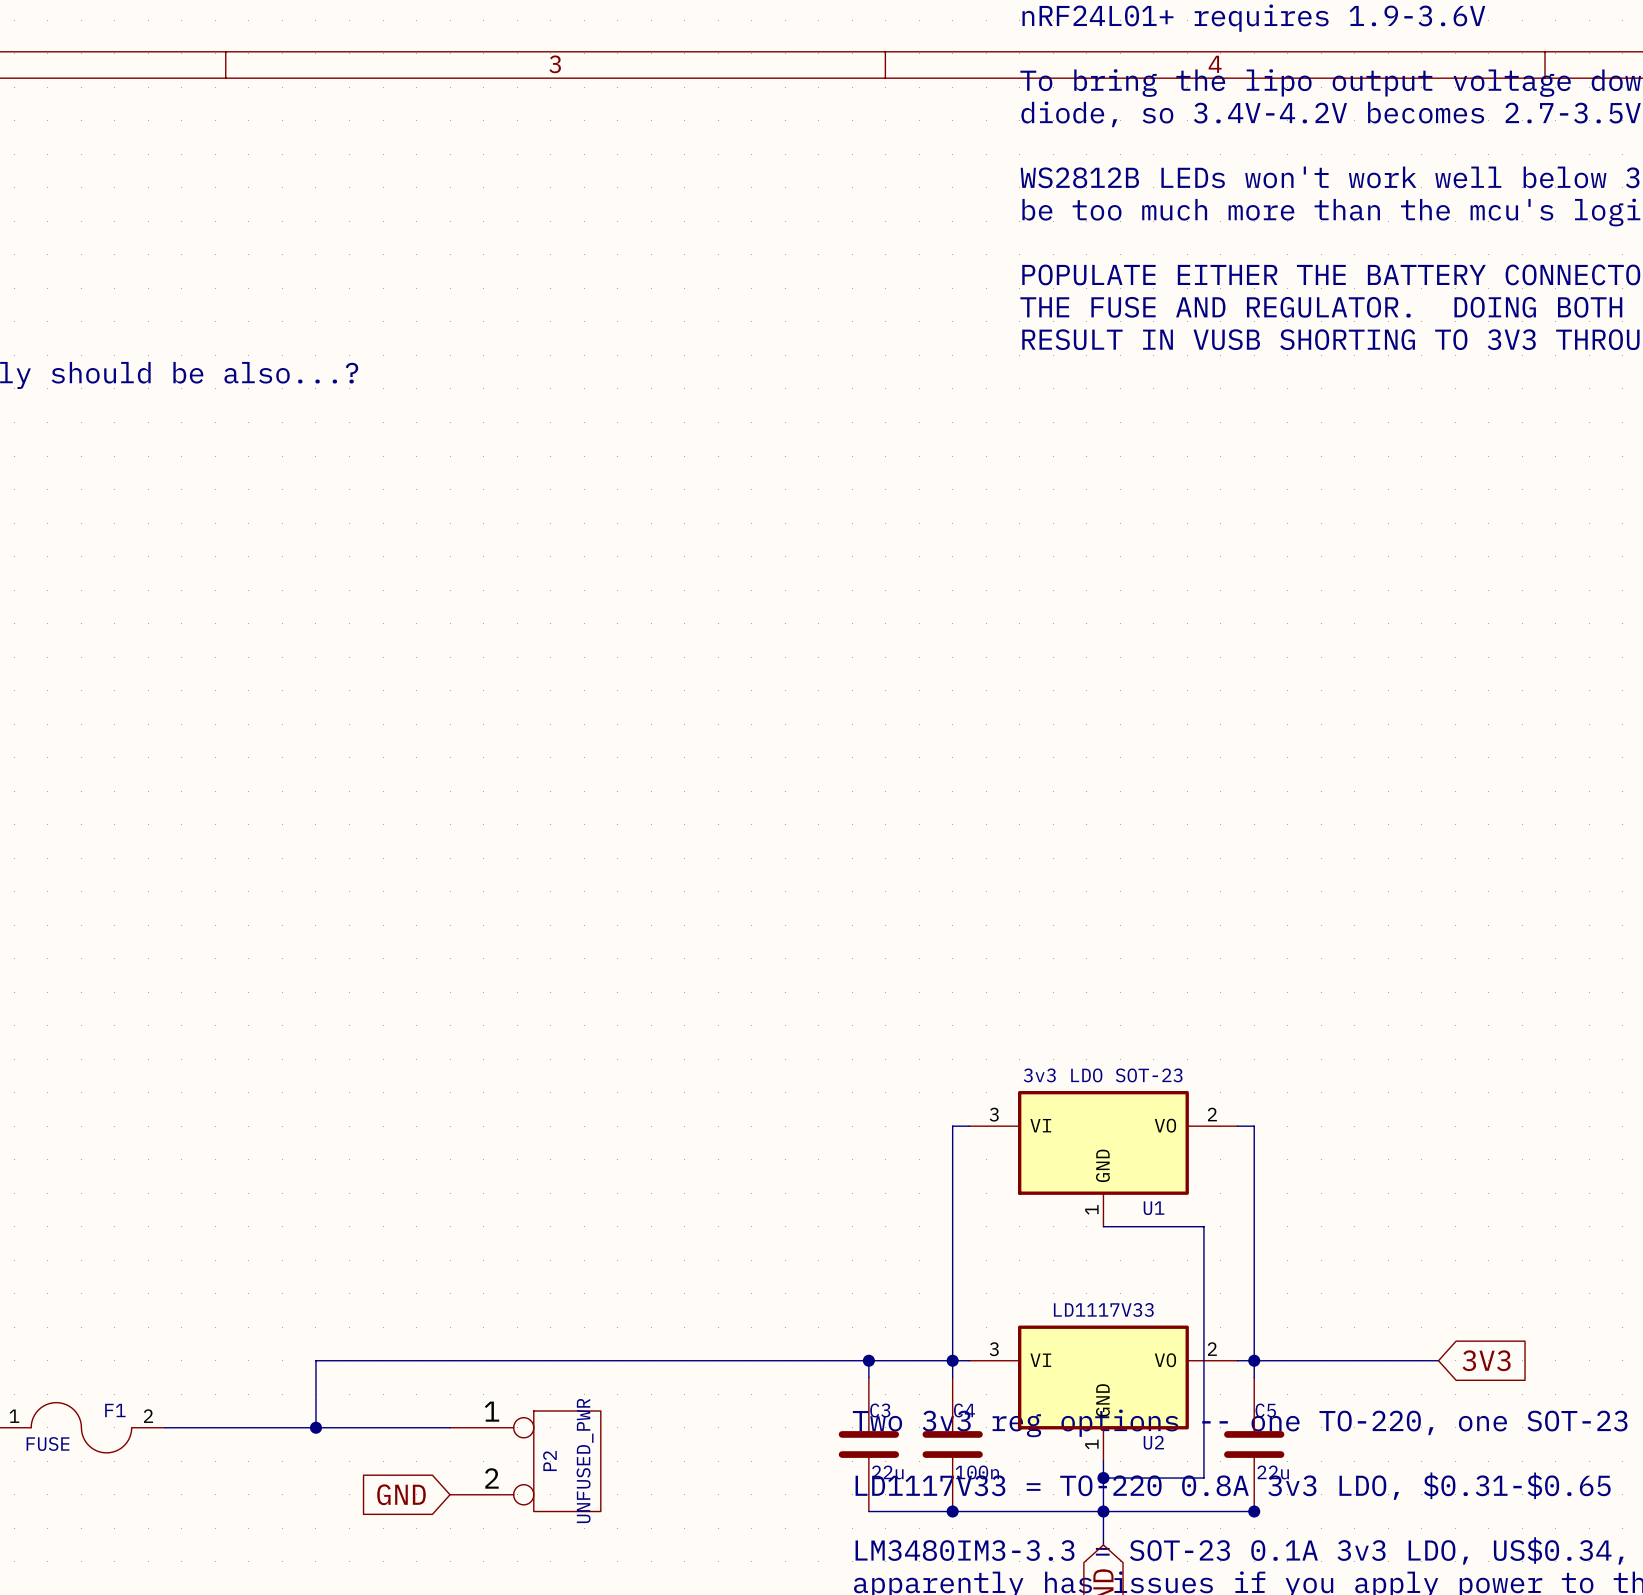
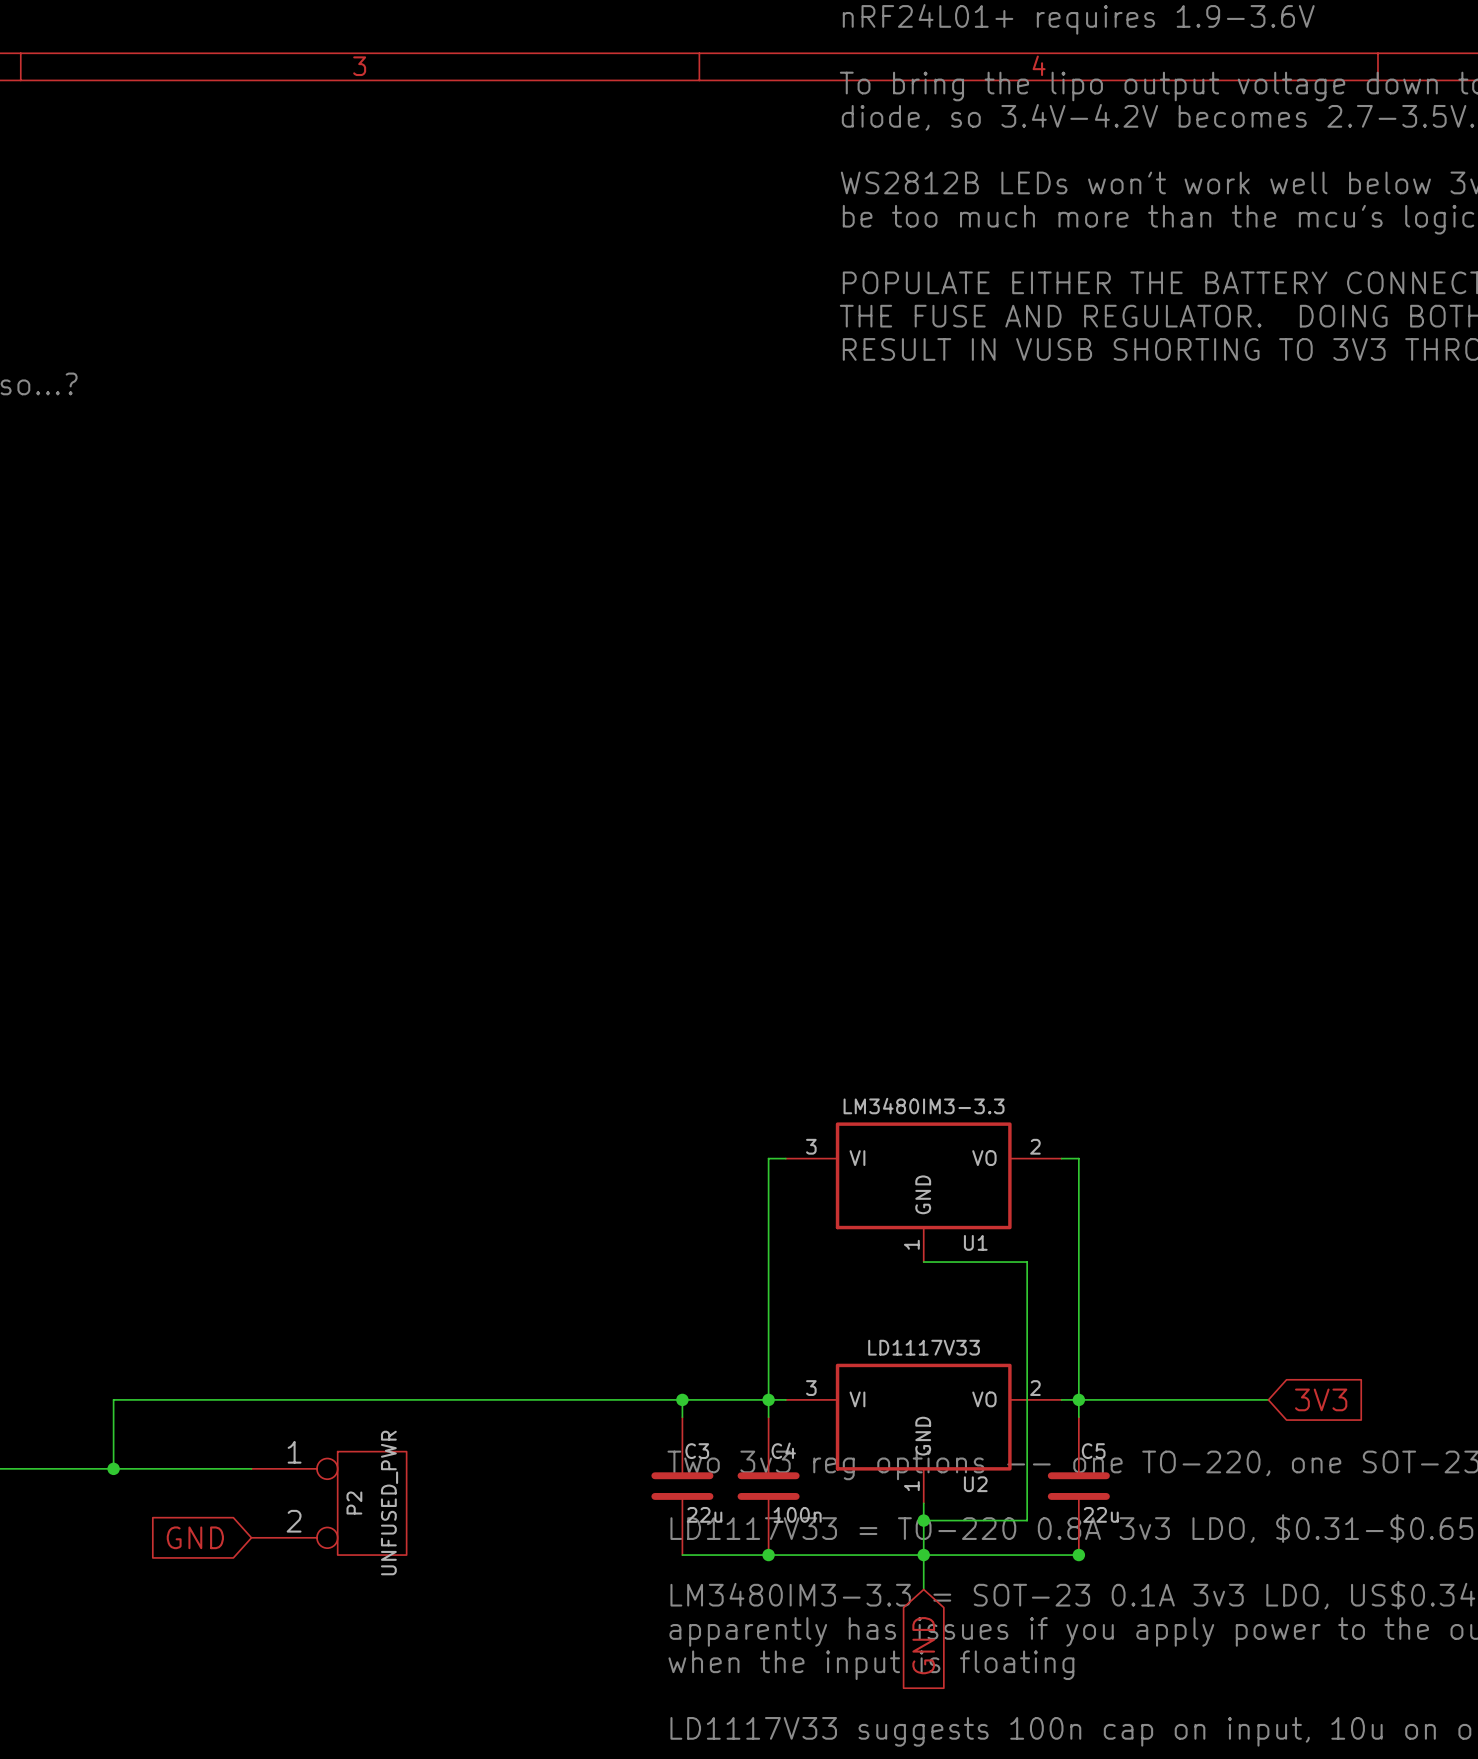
U1 value: 3v3 LDO SOT-23 (1103, 1075) -> LM3480IM3-3.3 (924, 1106)

